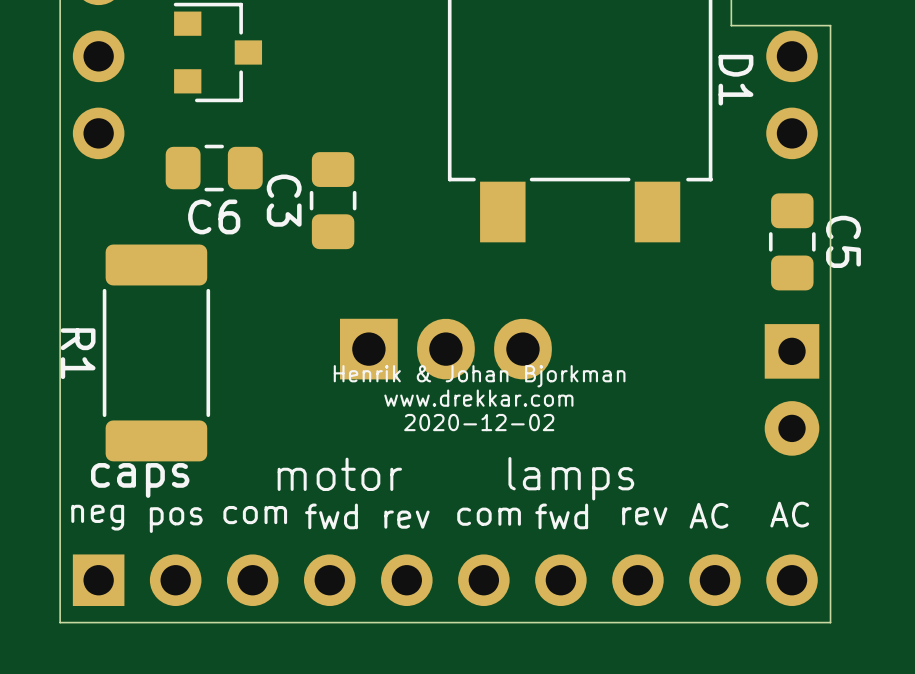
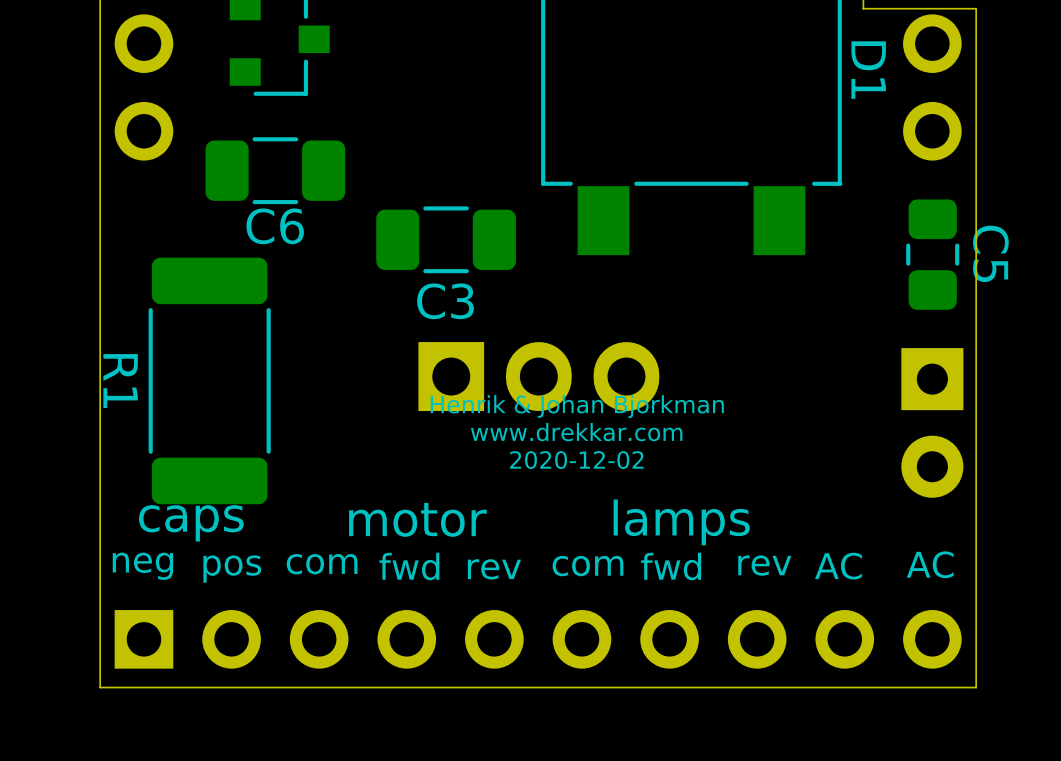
C6 footprint: [165, 144, 263, 192] -> [205, 137, 346, 205]
C3 footprint: [309, 152, 357, 250] -> [376, 206, 516, 274]
C3 name position: C3 (284, 200) -> C3 (445, 301)

